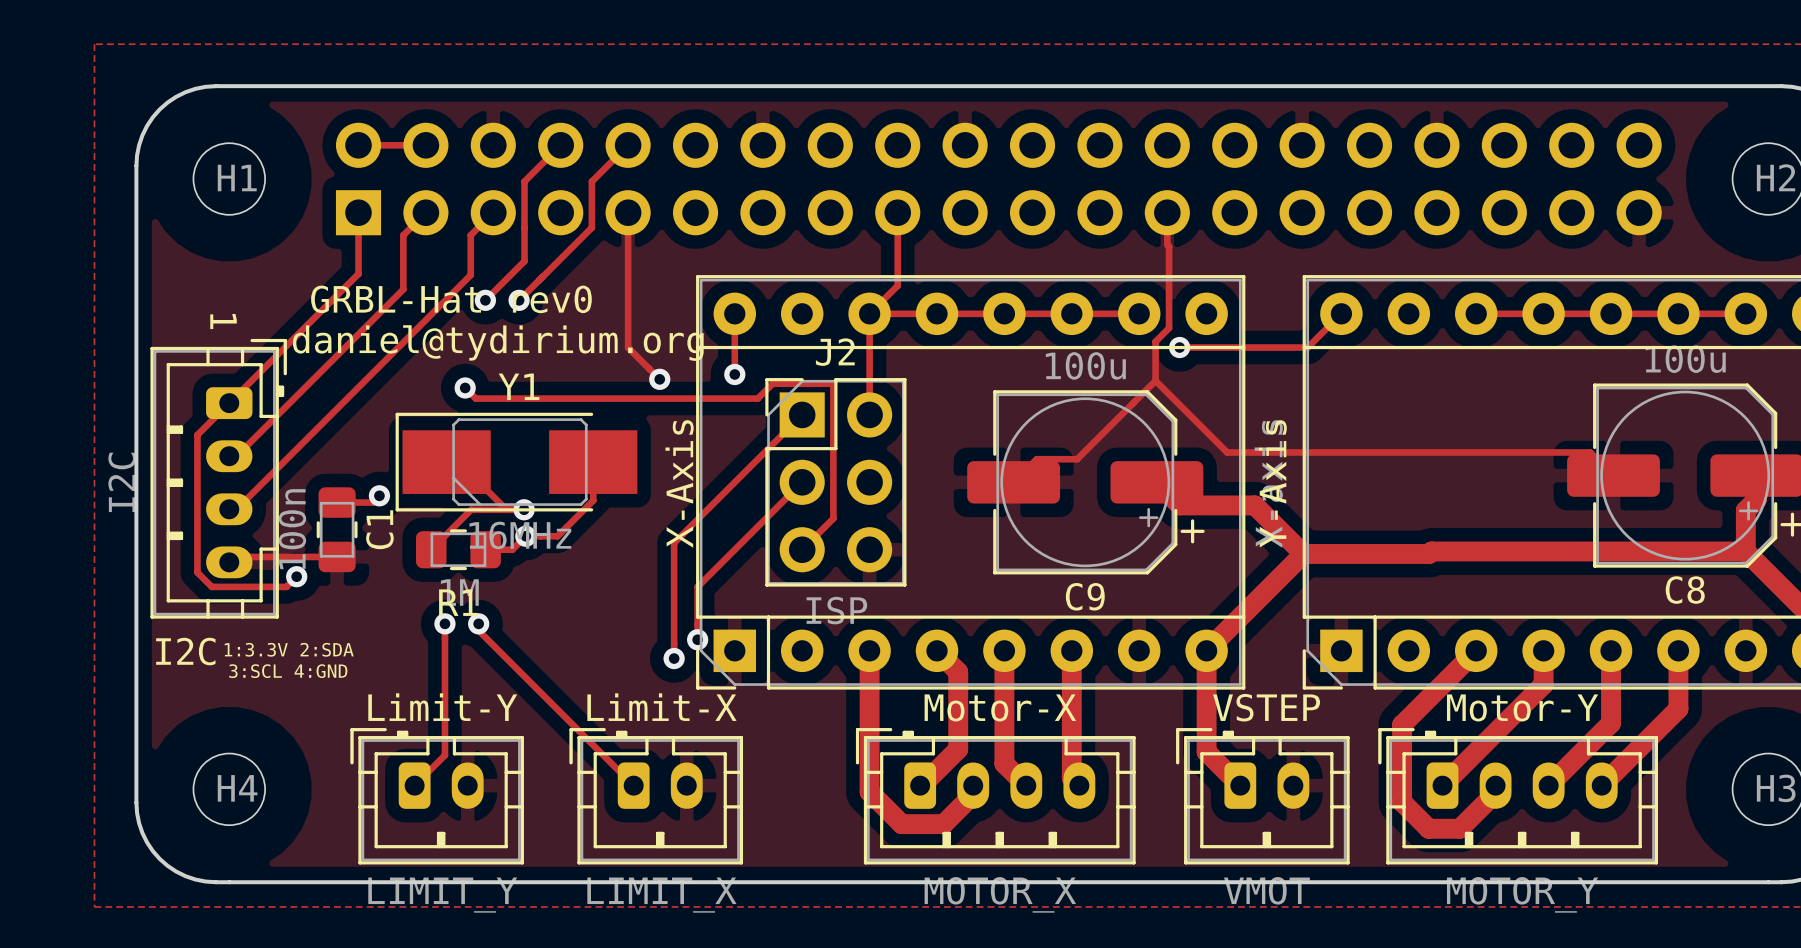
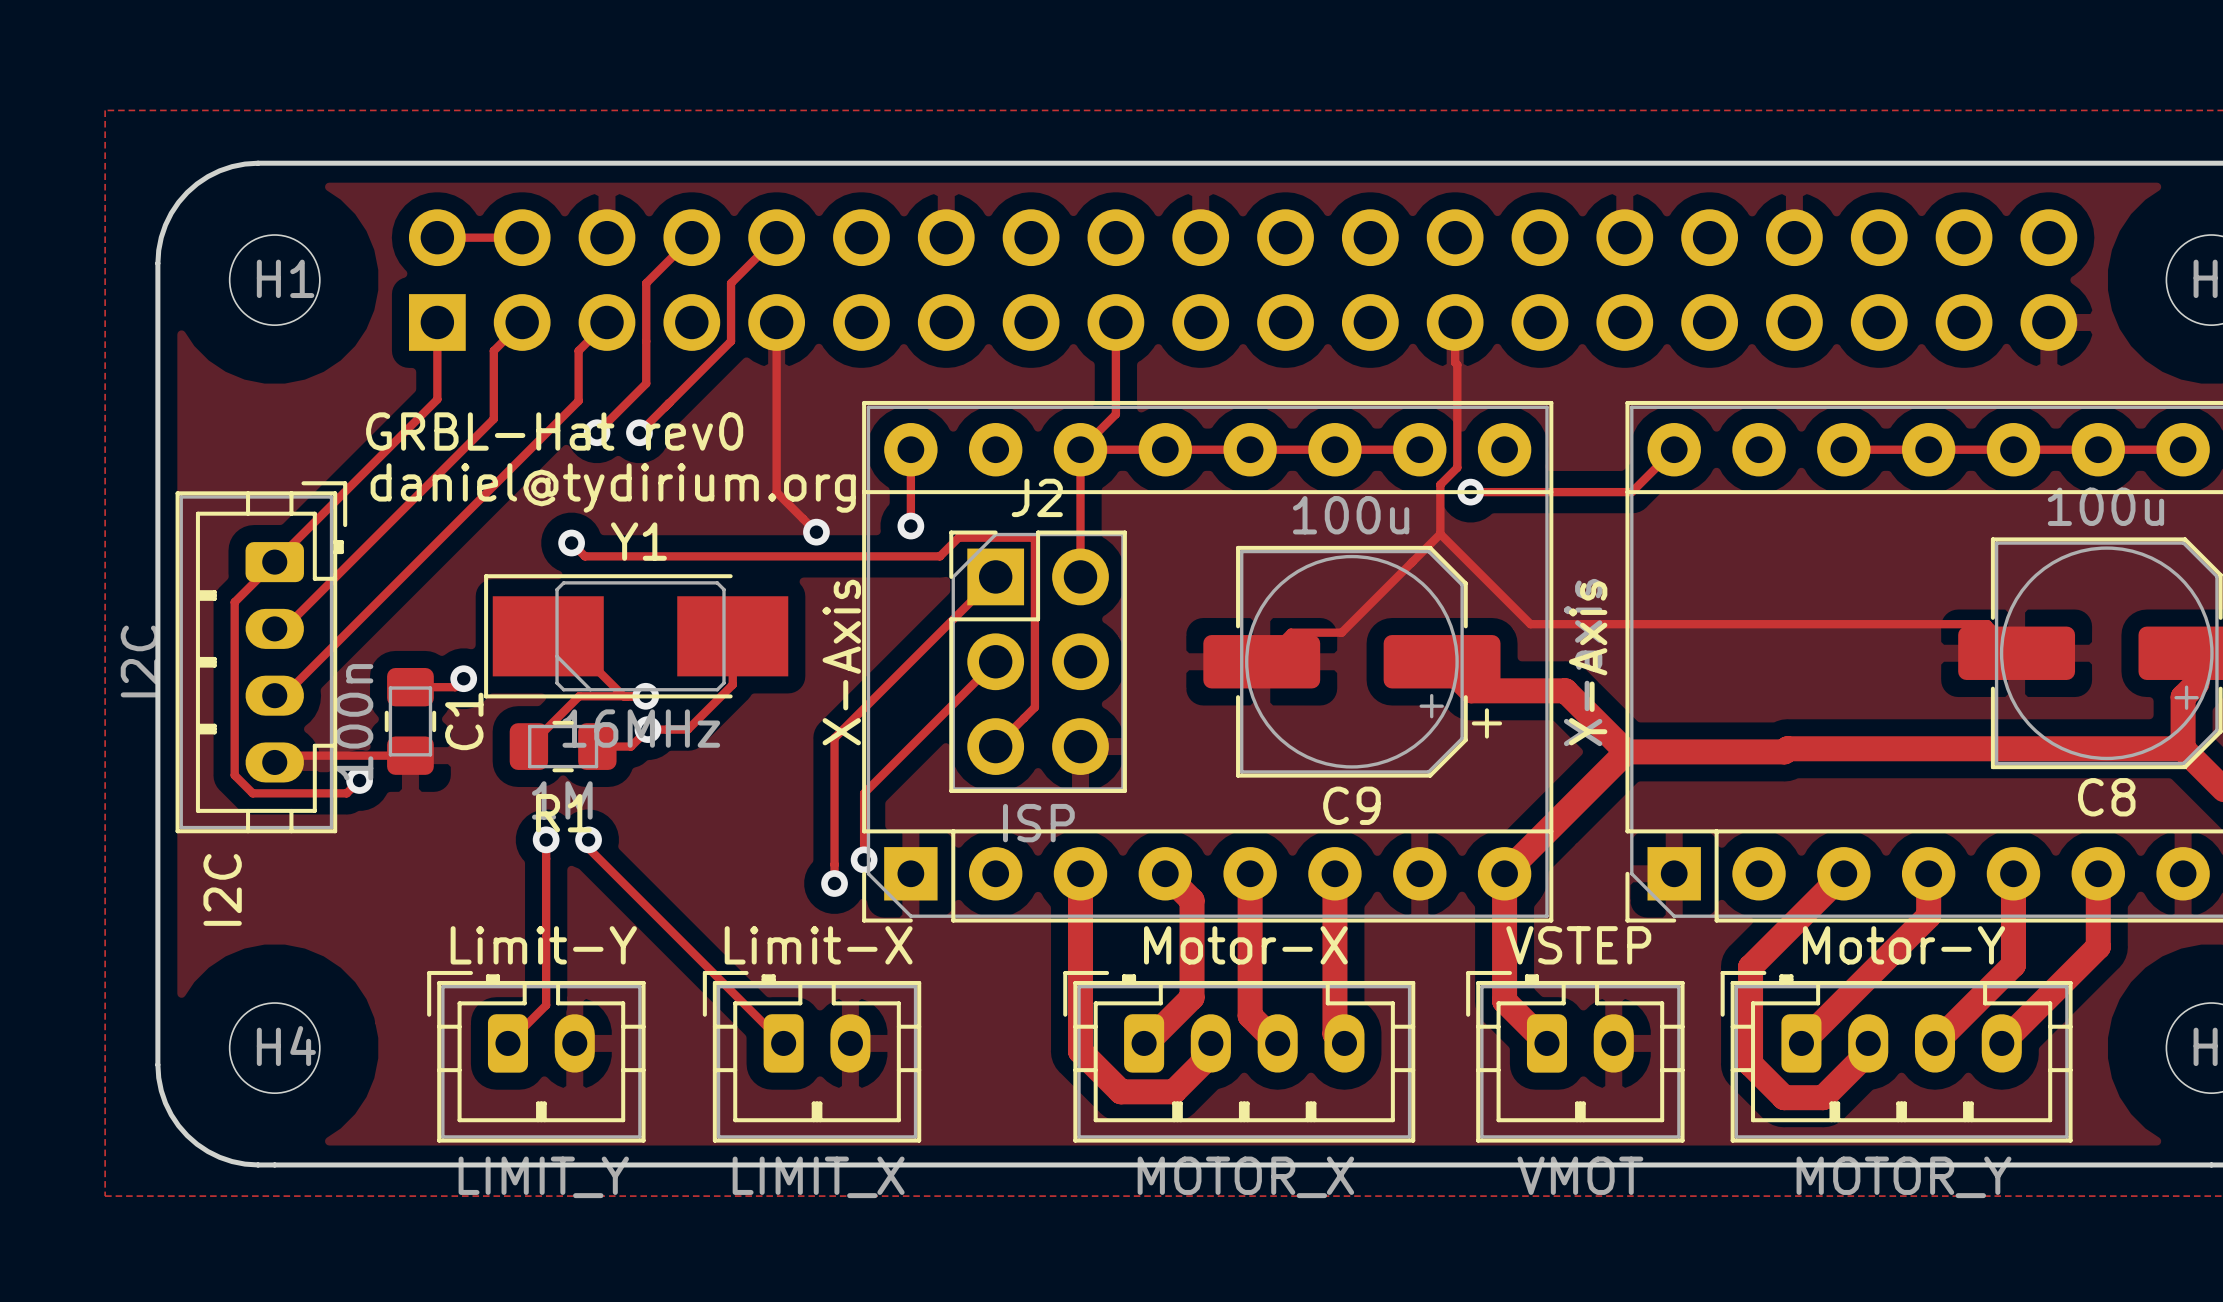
text: 1 (223, 321) -> none
text: 1:3.3V 2:SDA (289, 649) -> none
I2C name rotation: 0° (185, 651) -> 90° counterclockwise (222, 889)
text: 3:SCL 4:GND (288, 671) -> none

